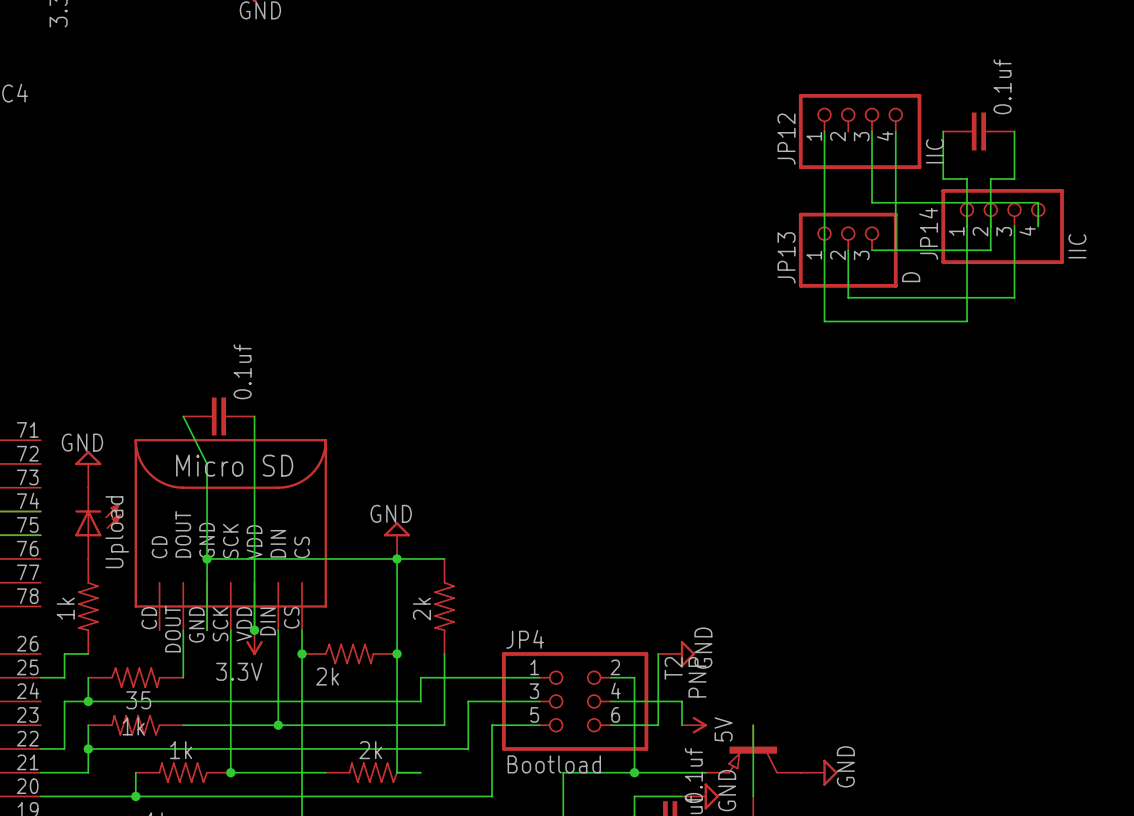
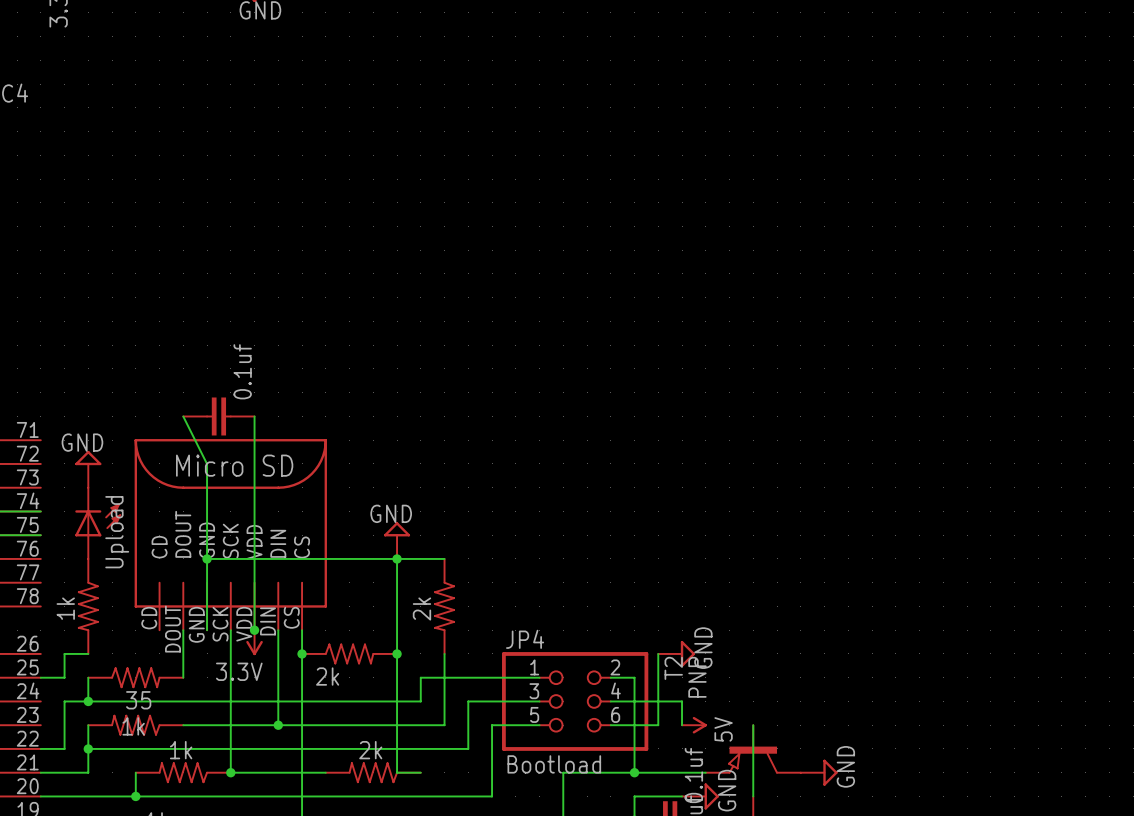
wire: (824, 131) (824, 321) (967, 321) (967, 179) (943, 179) (943, 131) -> none
JP12: IIC (860, 131) -> none
wire: (872, 131) (872, 202) (1038, 202) (1038, 226) -> none
wire: (895, 131) (895, 250) -> none
part: 0.1uf (978, 131) -> none
wire: (1014, 131) (1014, 179) (990, 179) (990, 250) (872, 250) -> none
JP14: IIC (1002, 226) -> none
wire: (1014, 226) (1014, 297) (848, 297) (848, 250) -> none
JP13: D (848, 250) -> none

